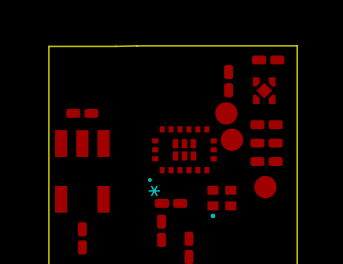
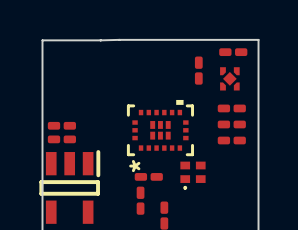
part: (82, 113) -> none
part: (226, 113) -> none
part footprint: [147, 126, 217, 182] -> [126, 99, 194, 157]
part: (231, 139) -> none
part: none -> (61, 125)
part: none -> (61, 139)
part: (82, 171) -> none
part: (265, 187) -> none
part: none -> (69, 186)
part: (82, 238) -> none

